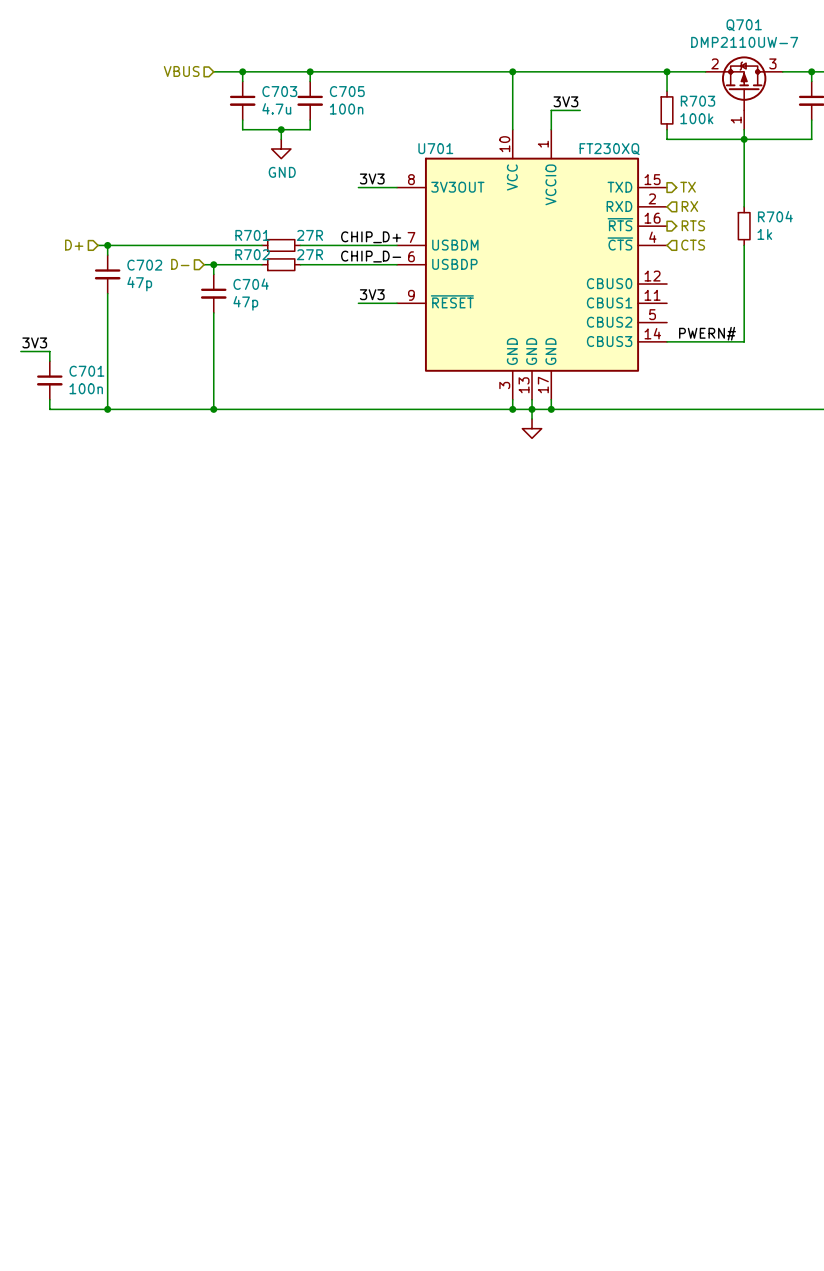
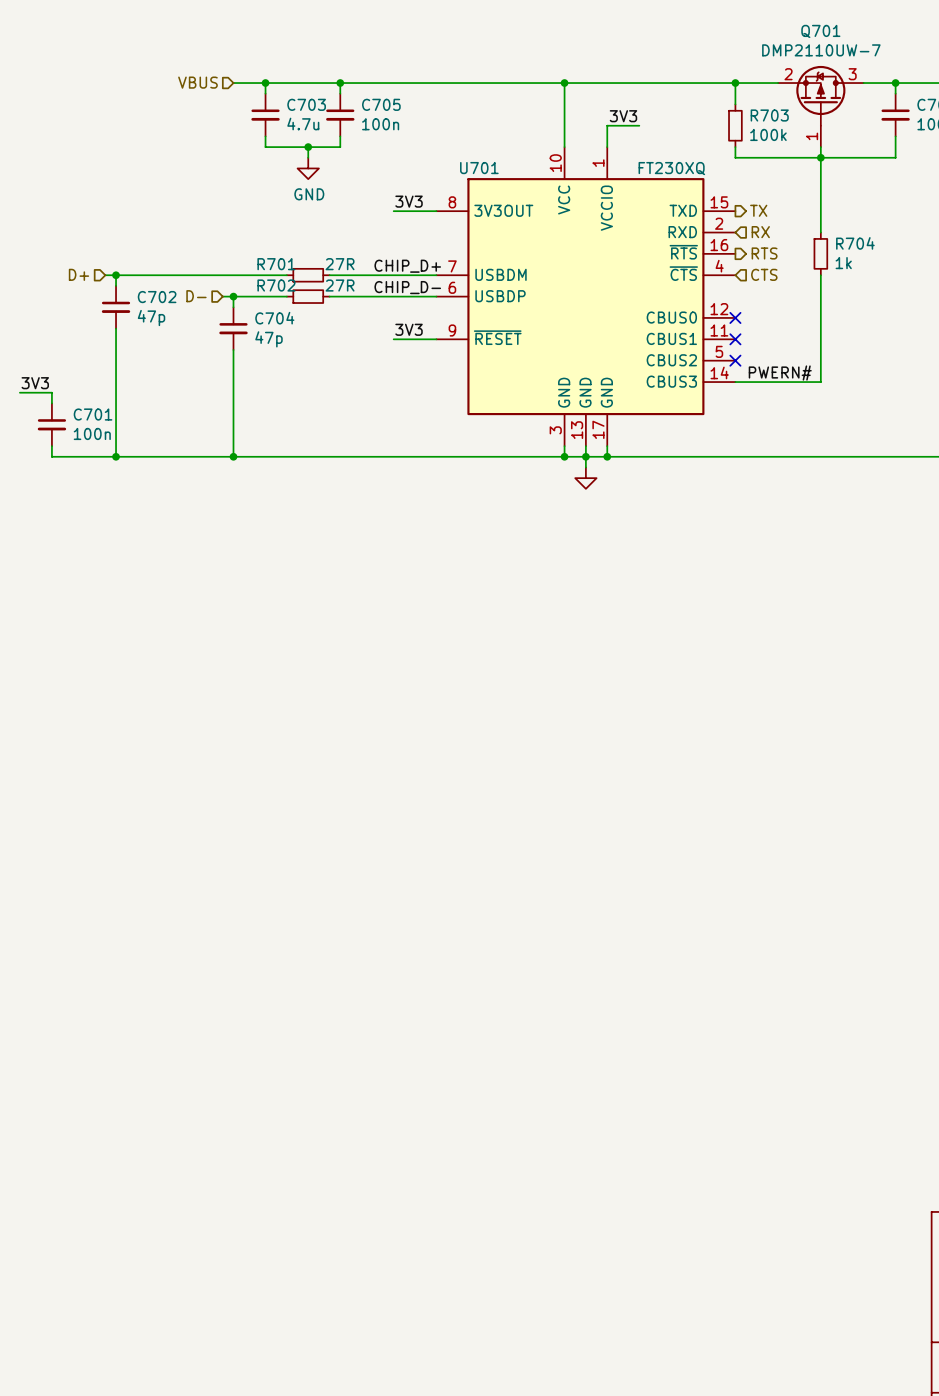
no-connect mark: none -> (735, 317)
no-connect mark: none -> (735, 339)
no-connect mark: none -> (735, 360)

